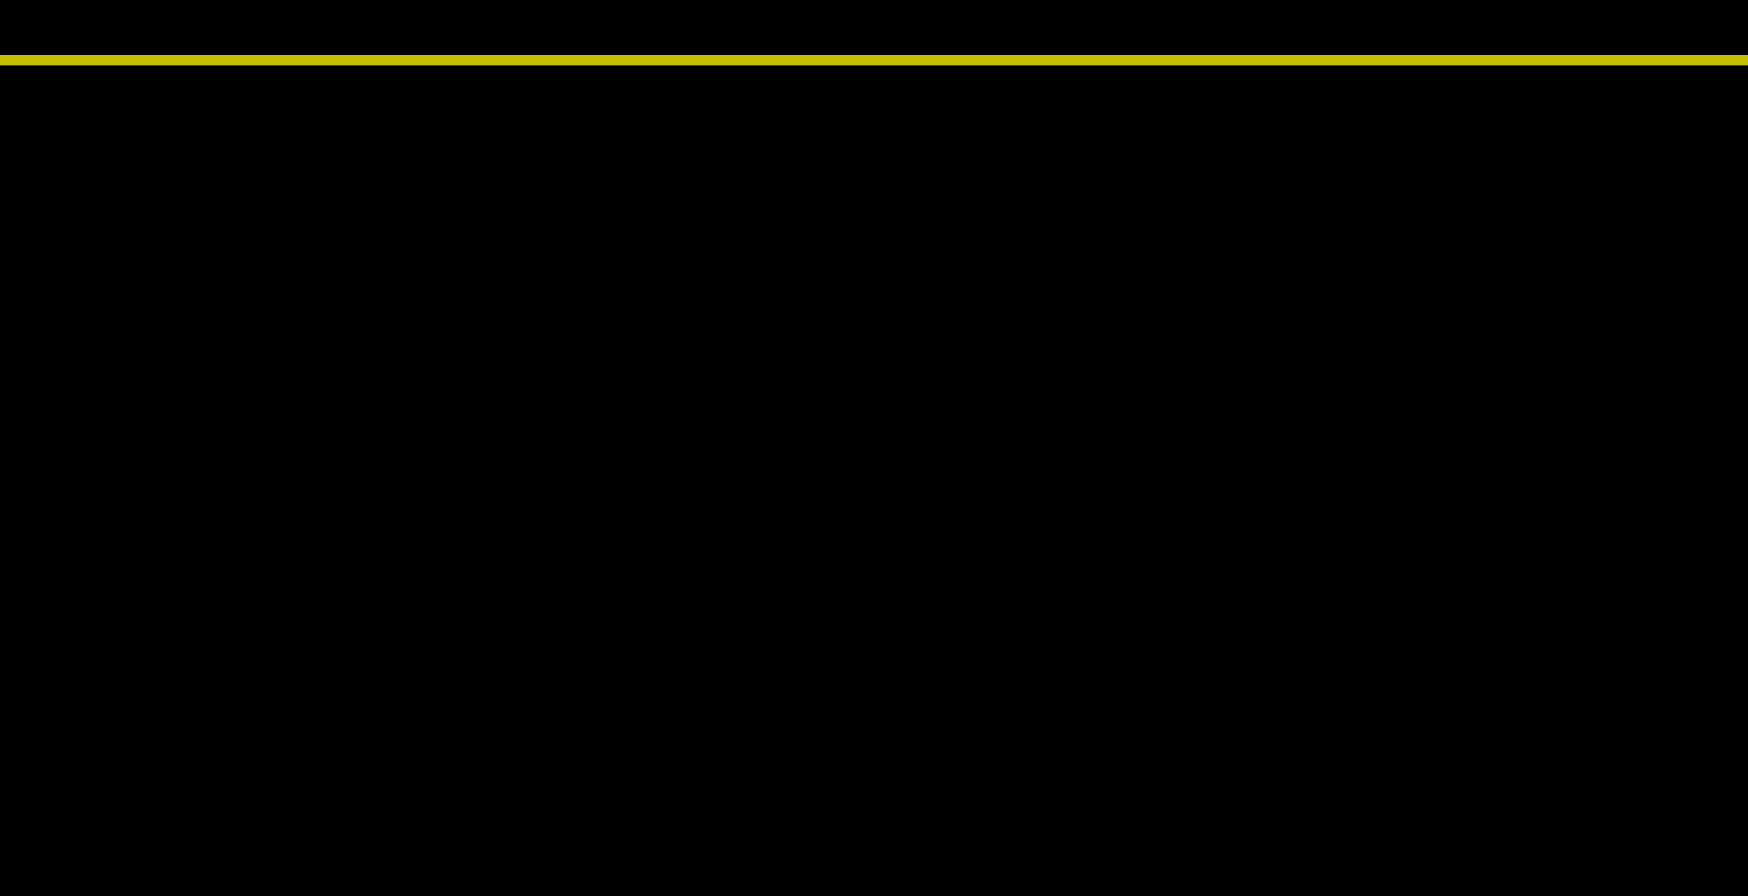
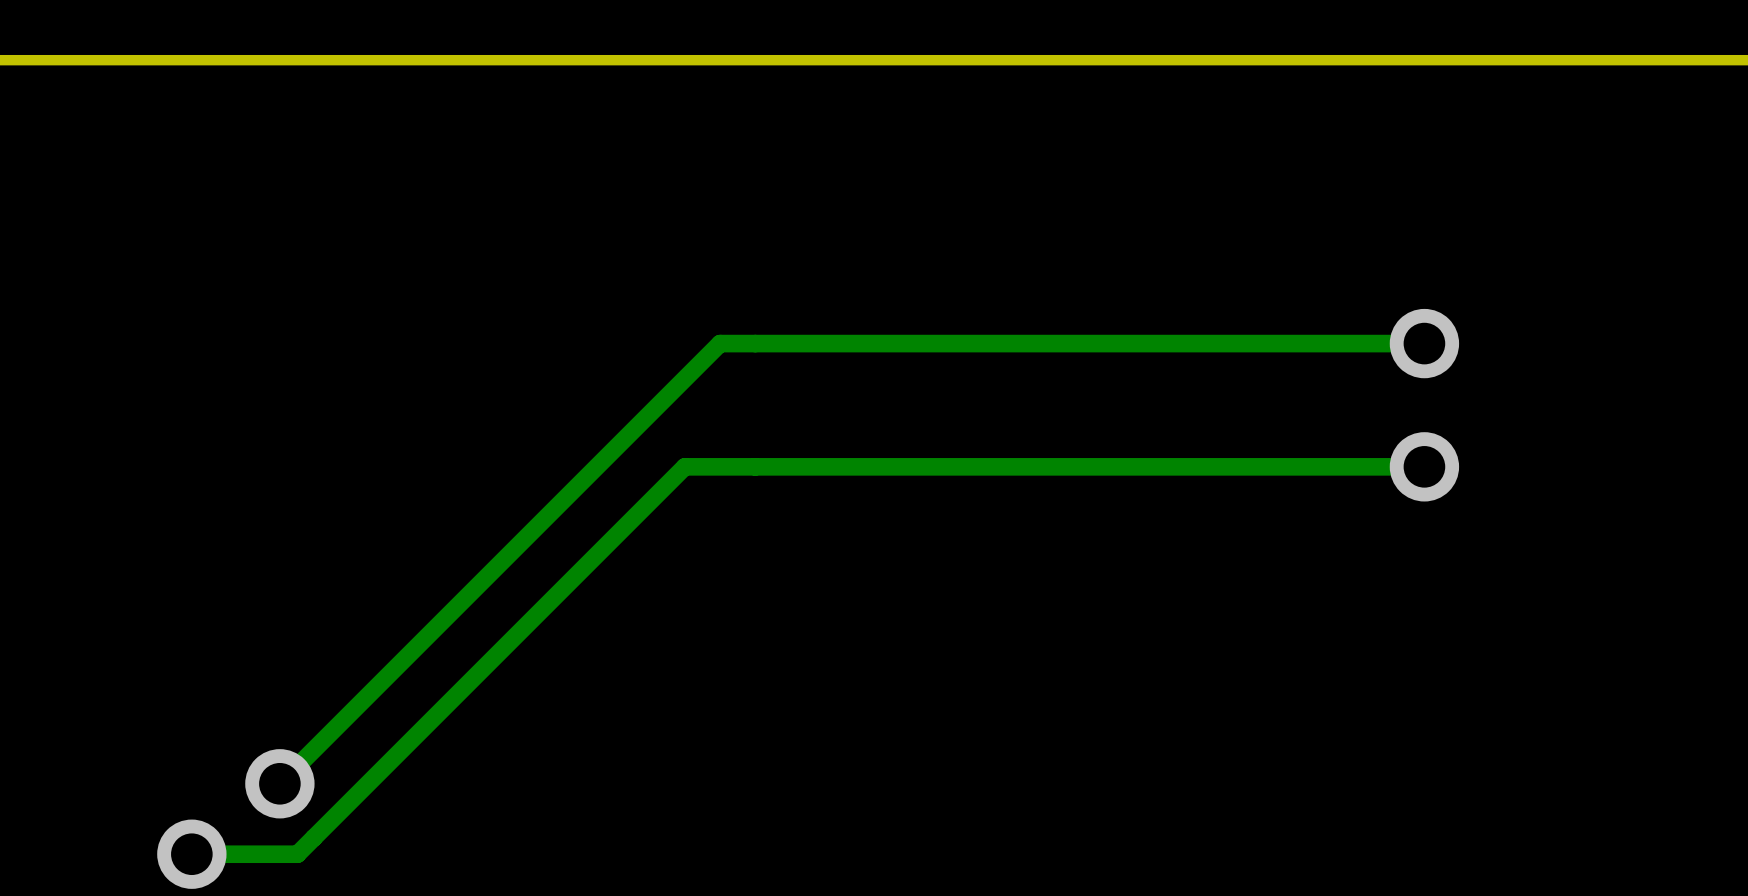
track: none -> (1424, 343) (720, 343) (279, 783)
via: none -> (1424, 343)
track: none -> (1424, 466) (684, 466) (297, 854) (191, 854)
via: none -> (1424, 466)
via: none -> (279, 783)
via: none -> (191, 854)

